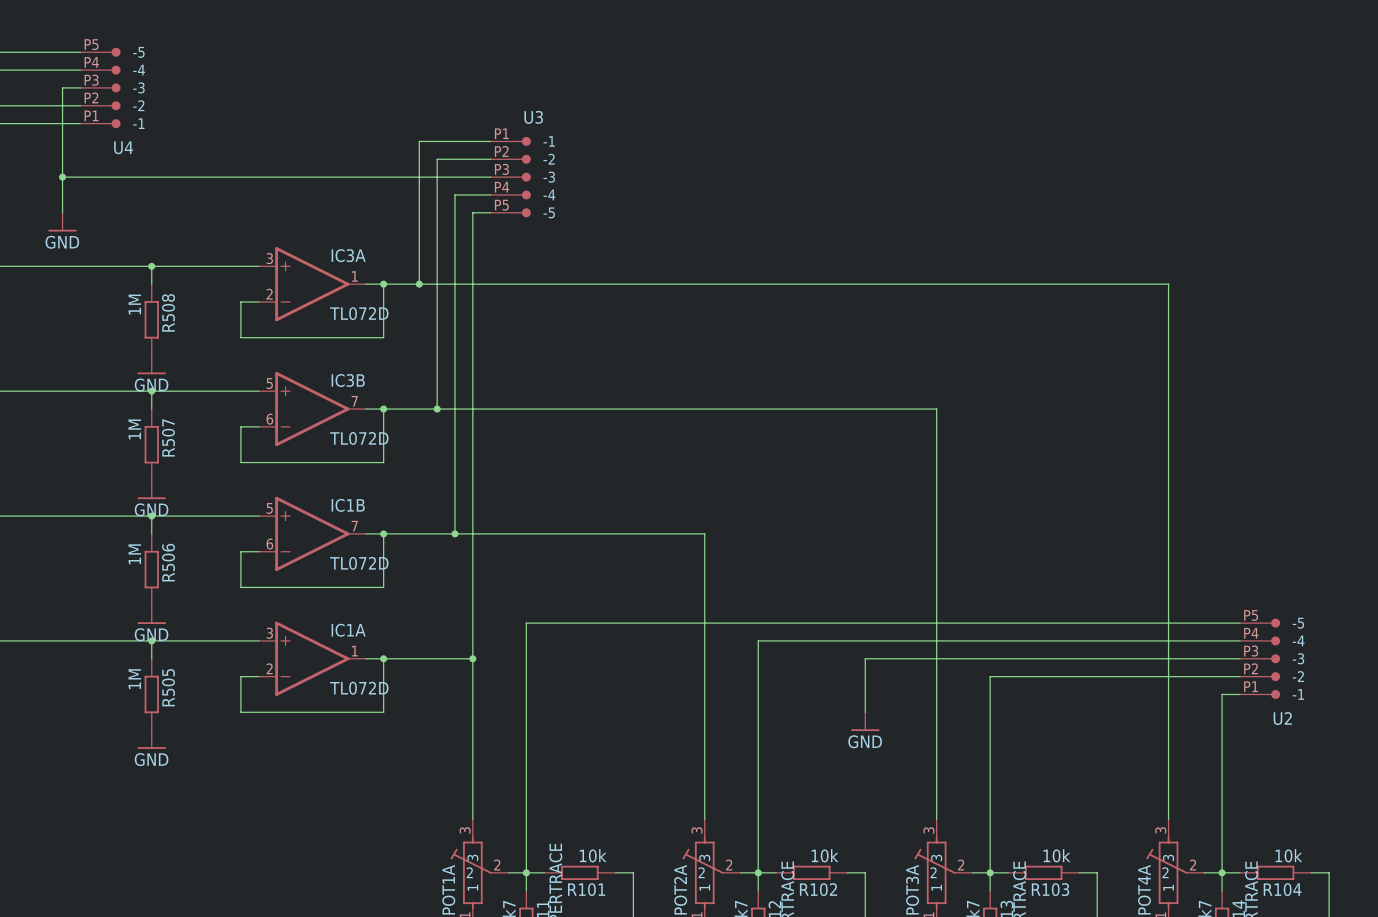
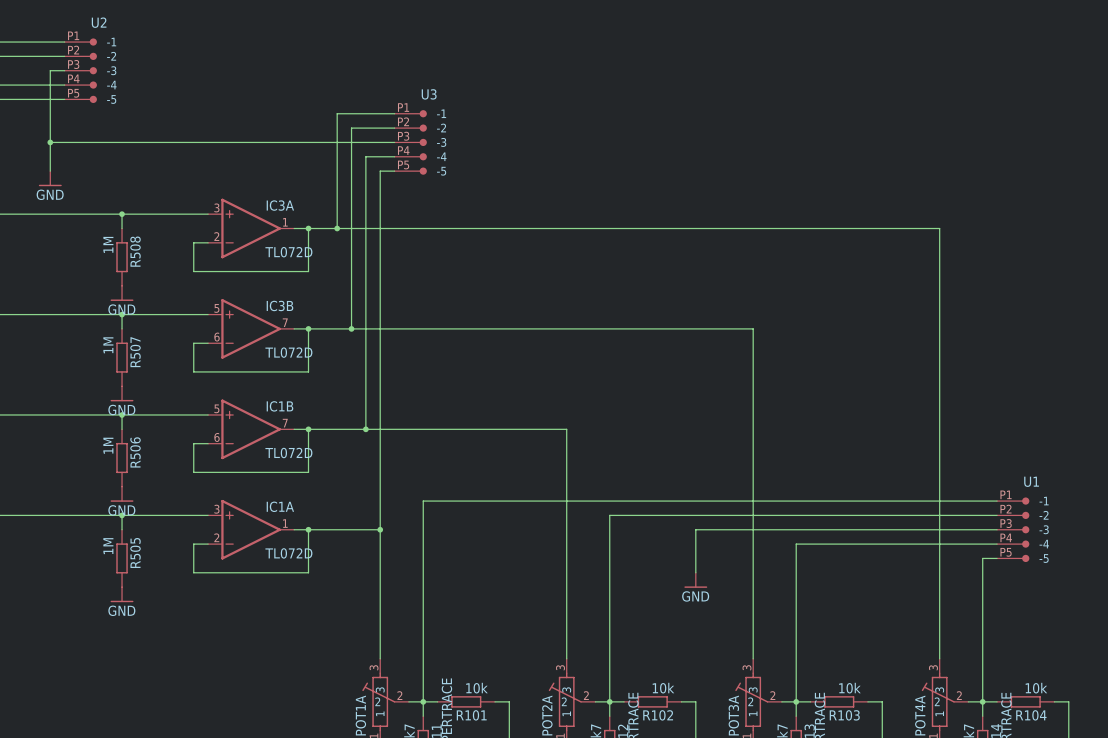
U4: (100, 87) -> none
U2 position: (1259, 658) -> (80, 70)
U1: none -> (1013, 529)
U2 flip: as is (1275, 658) -> up-down (93, 70)

